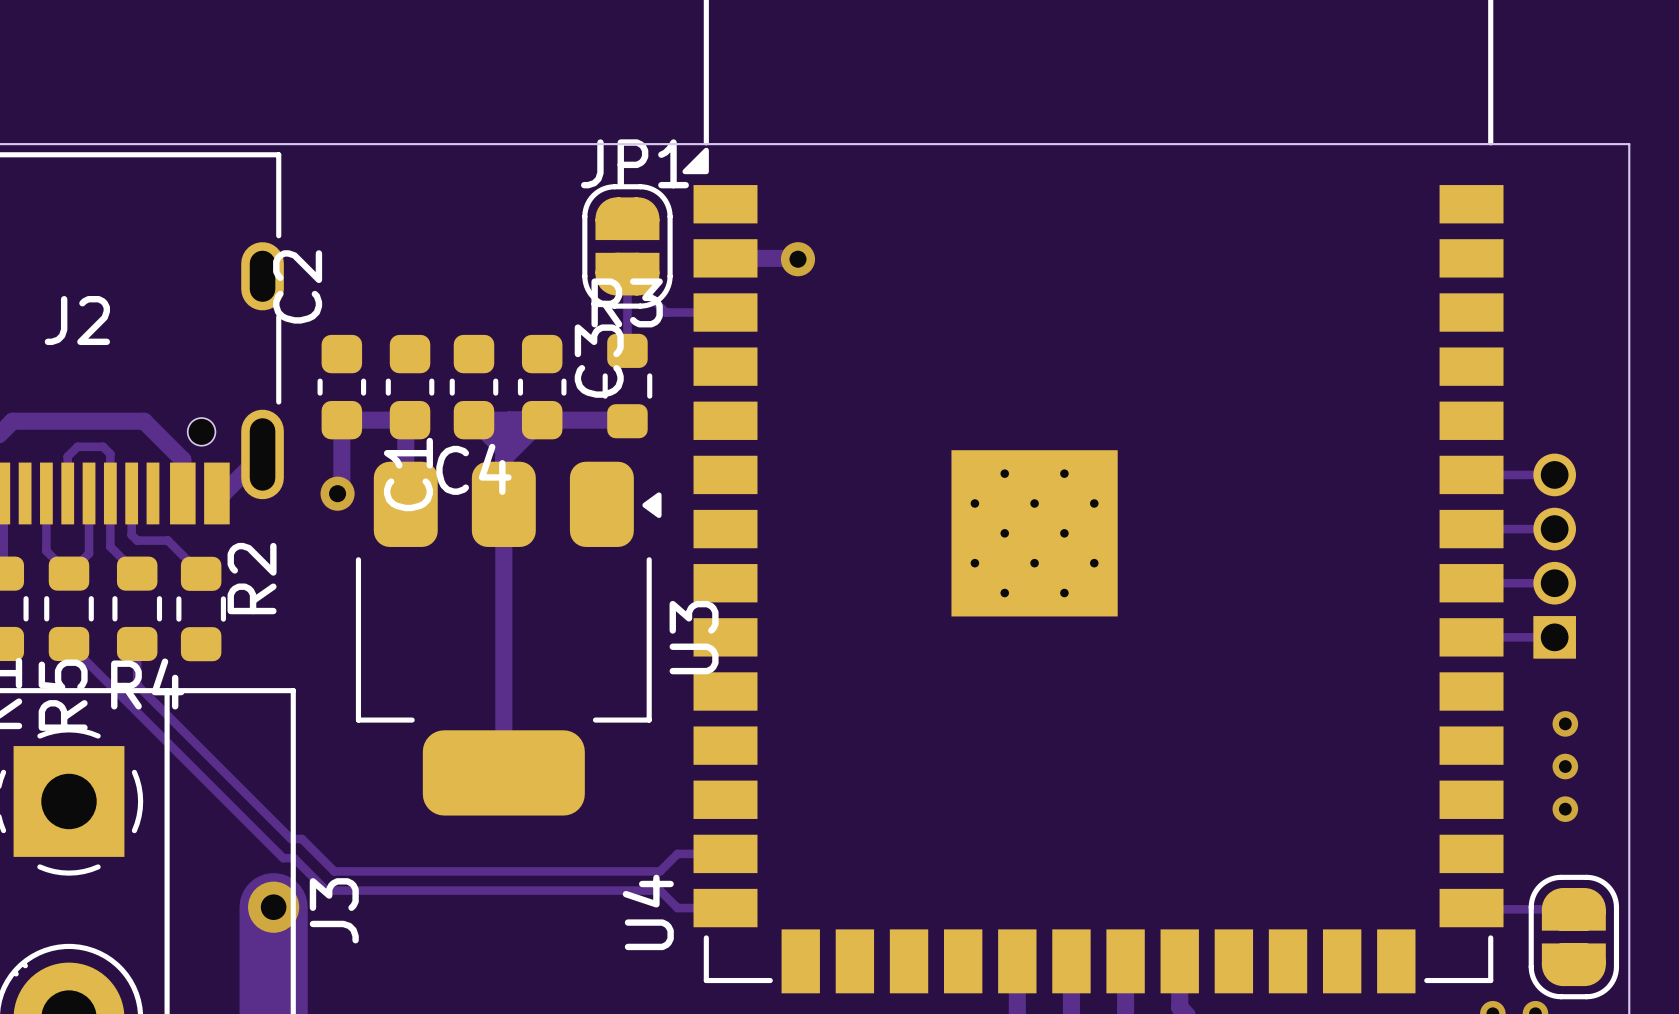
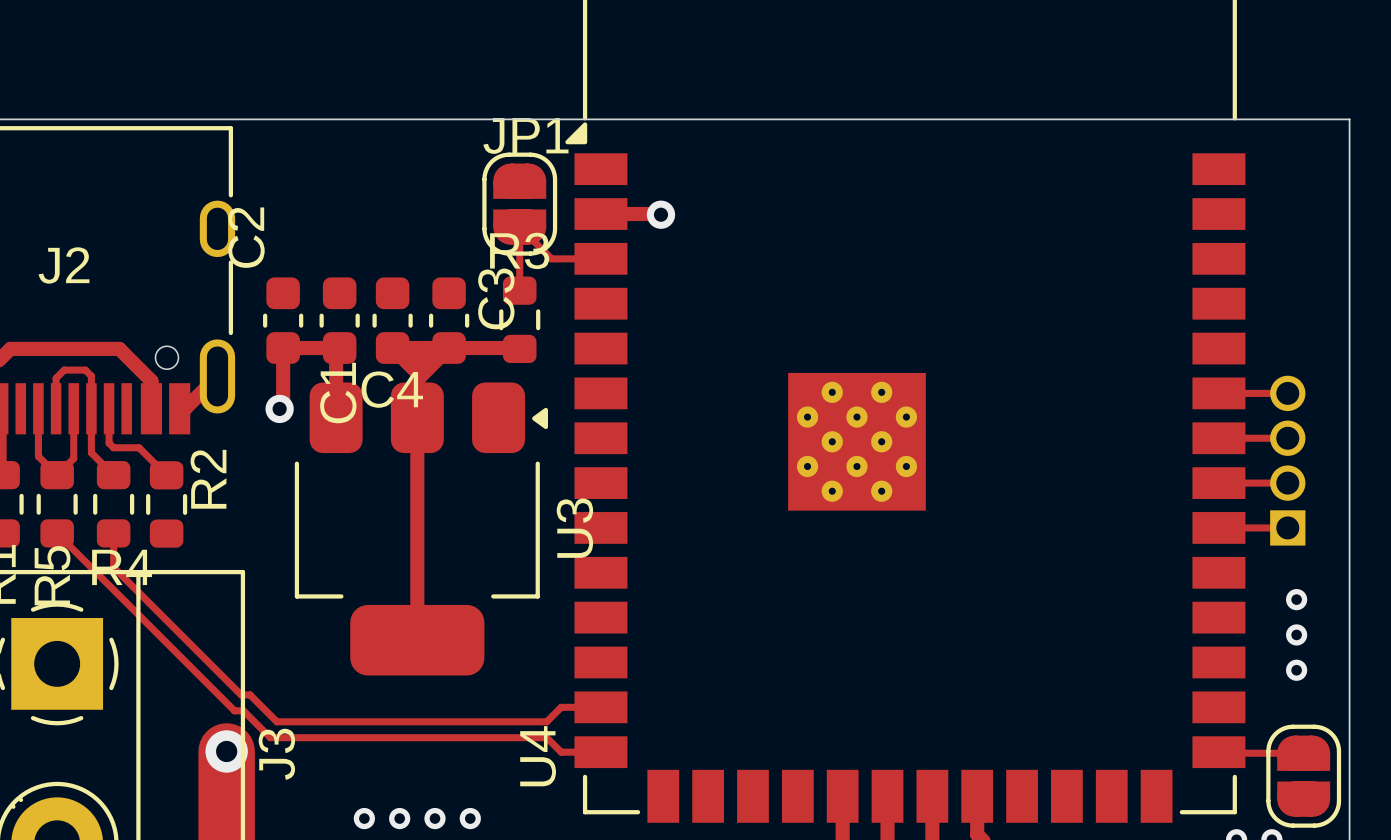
via: none -> (364, 818)
via: none -> (399, 818)
via: none -> (434, 818)
via: none -> (470, 818)

